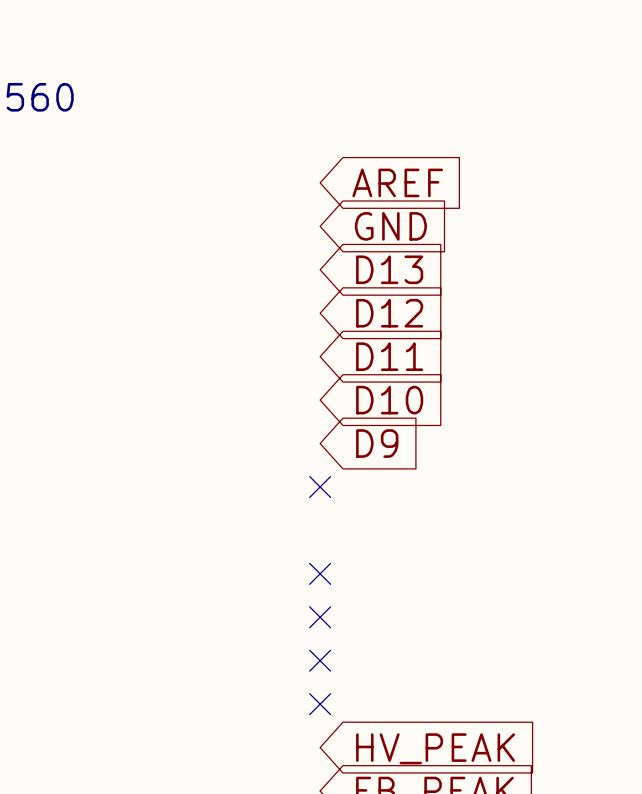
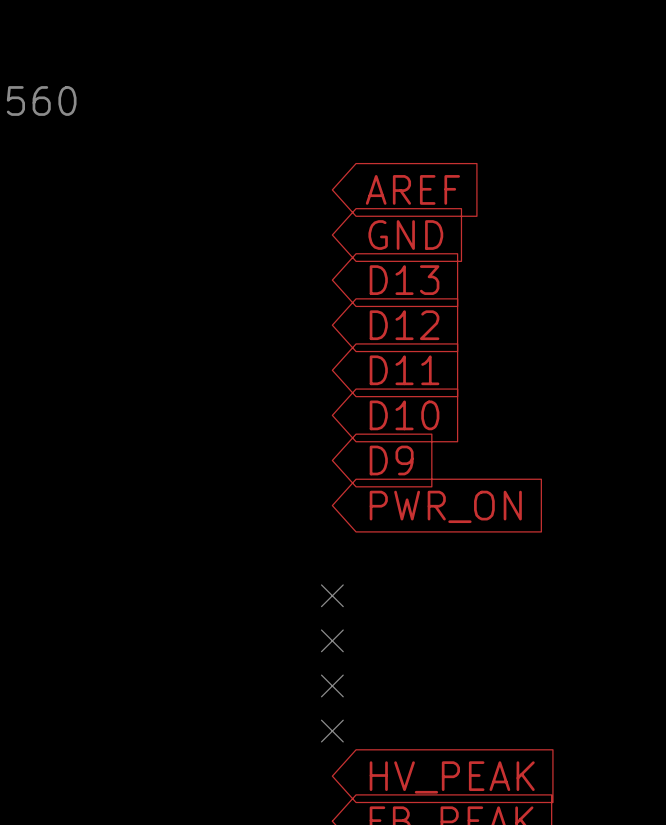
no-connect mark: (320, 486) -> none
global label: none -> PWR_ON (445, 506)

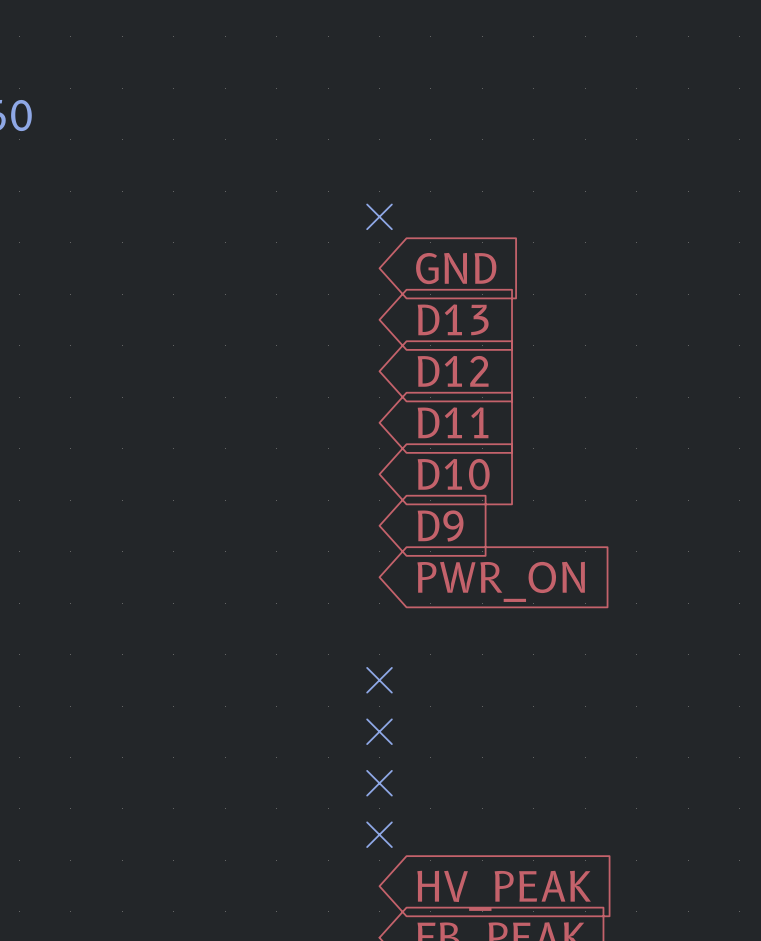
no-connect mark: none -> (379, 216)
global label: AREF (412, 189) -> none

